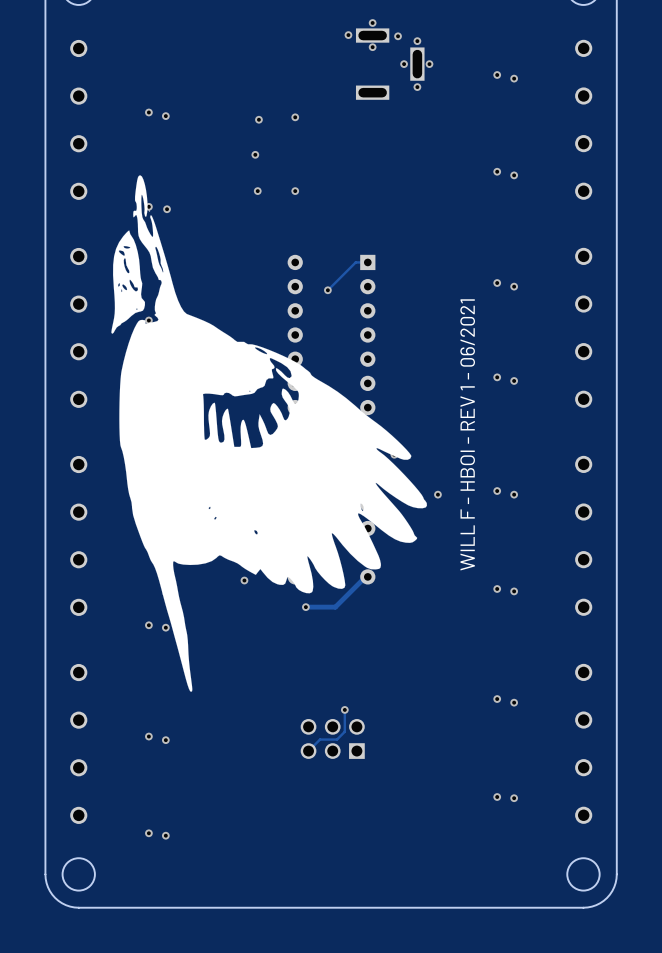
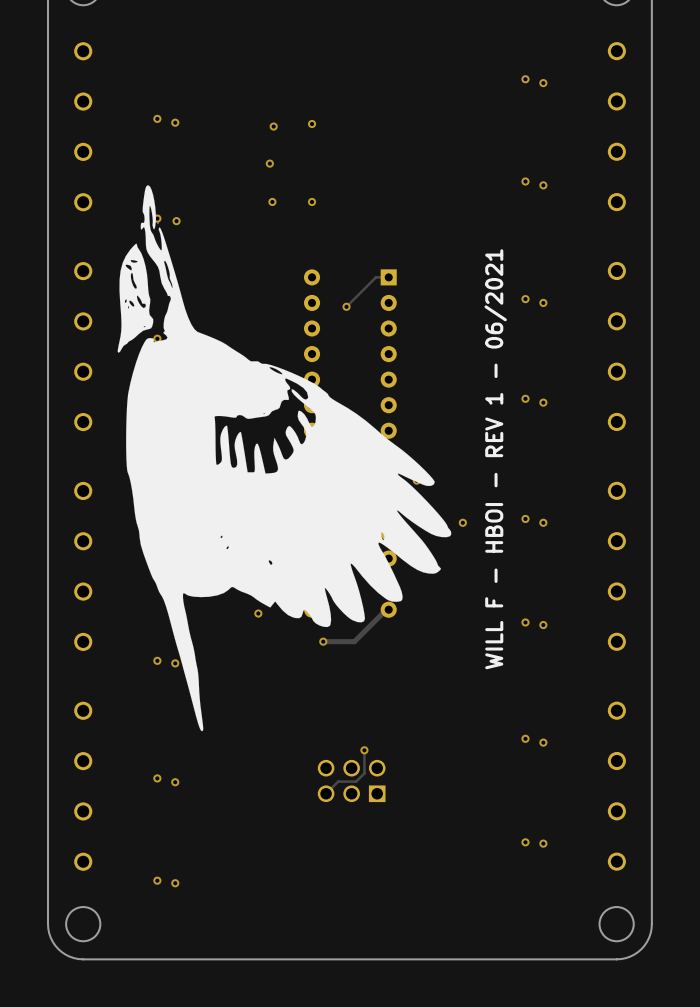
via: (372, 22) -> none
via: (348, 35) -> none
via: (398, 36) -> none
via: (417, 41) -> none
via: (372, 47) -> none
part: (390, 64) -> none
via: (404, 64) -> none
via: (429, 64) -> none
via: (417, 87) -> none

